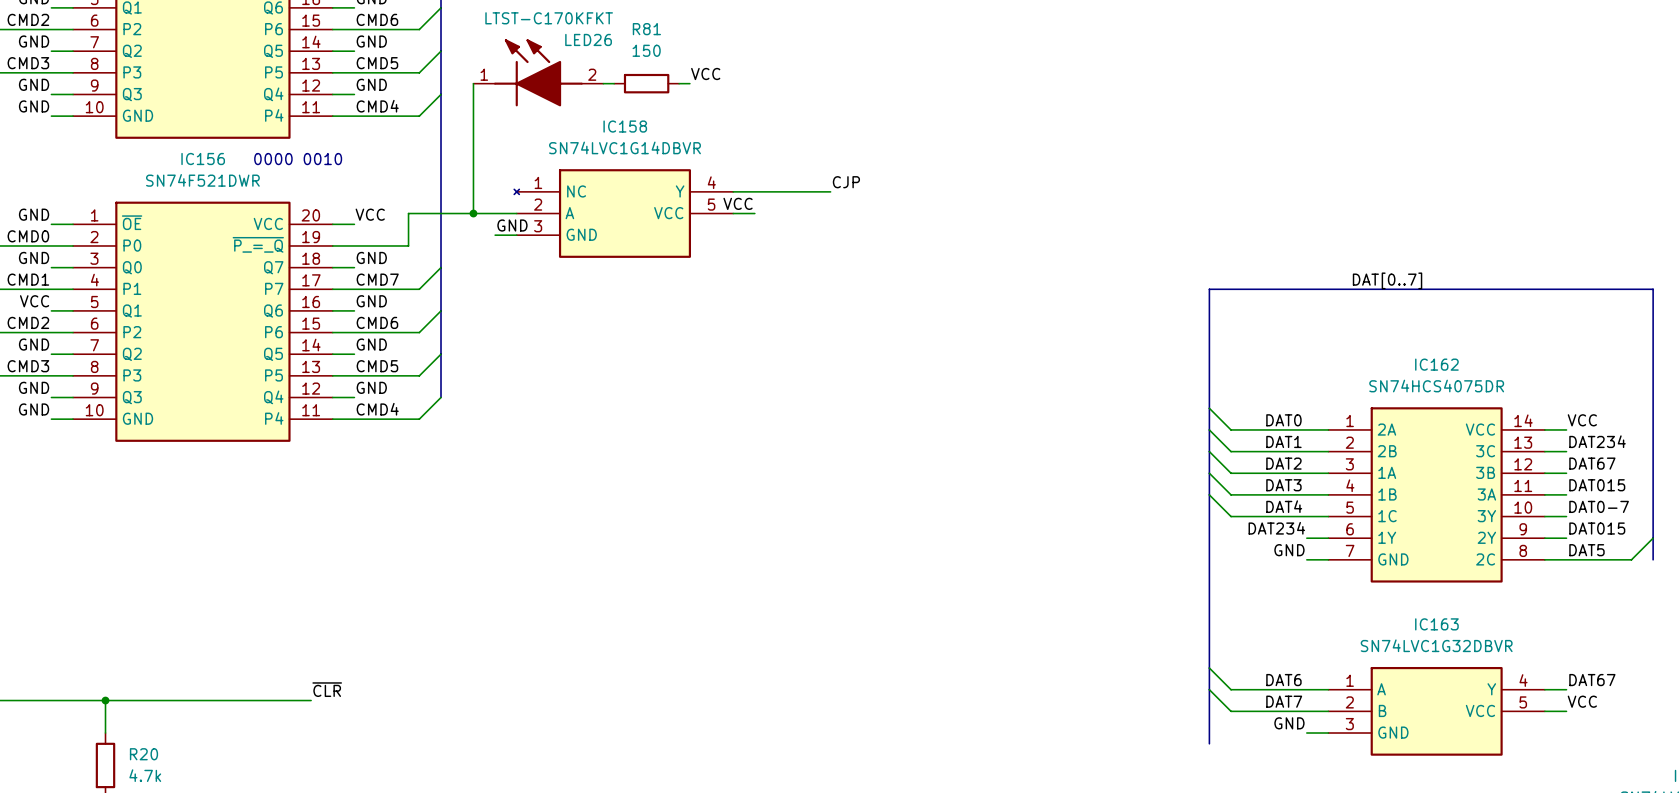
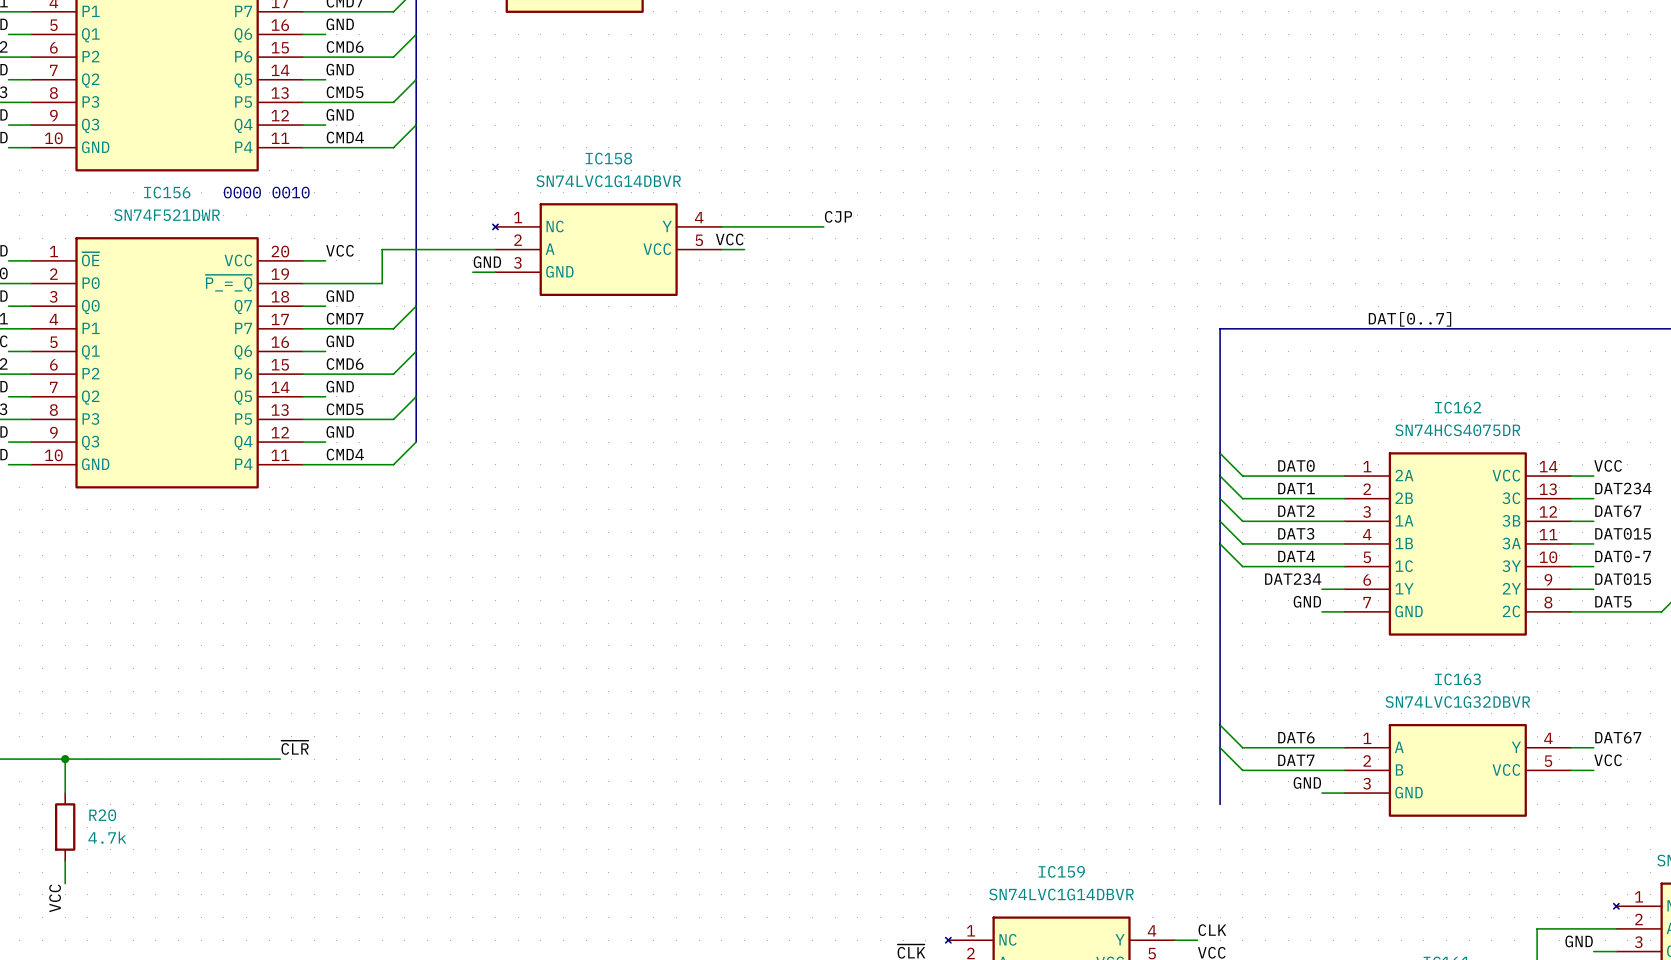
LED26: LTST-C170KFKT (538, 72) -> none
label: VCC (705, 74) -> none
wire: (473, 83) (473, 213) -> none
wire: (603, 83) (614, 83) -> none
R81: 150 (646, 83) -> none
wire: (679, 83) (689, 83) -> none
junction: (473, 213) -> none

